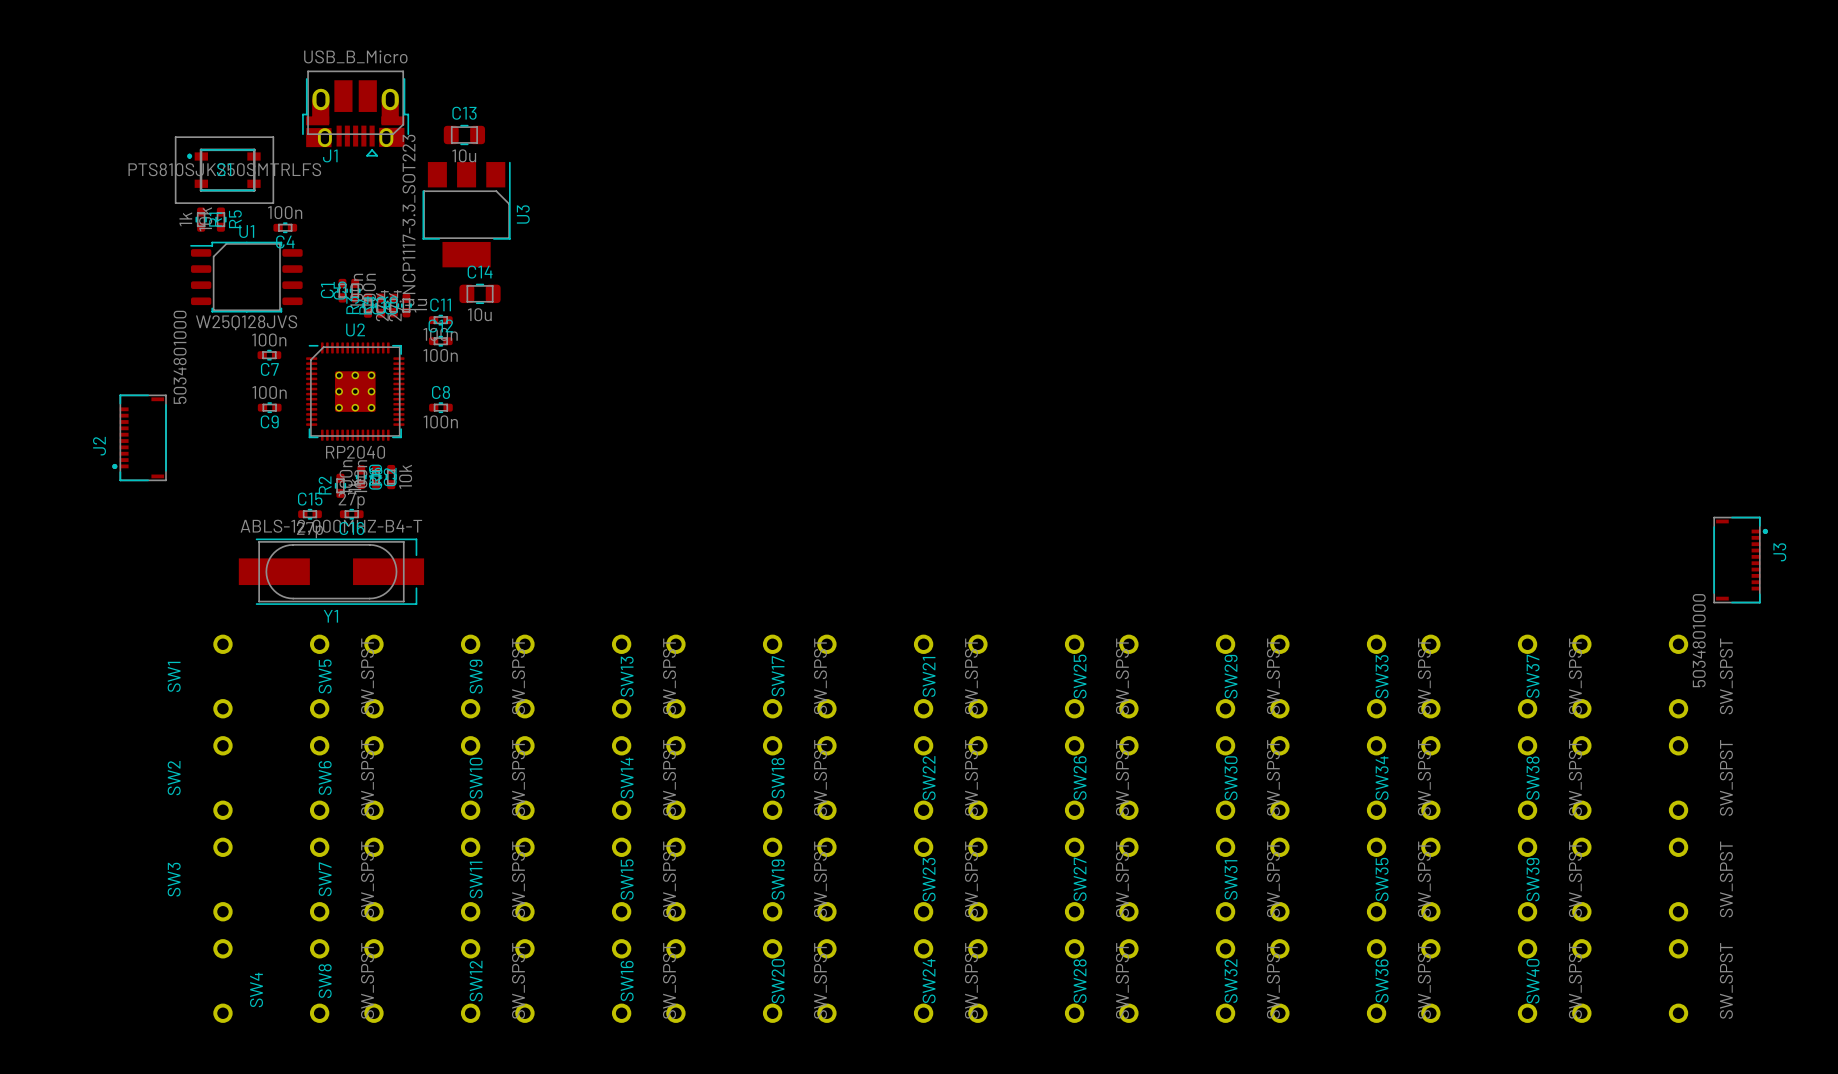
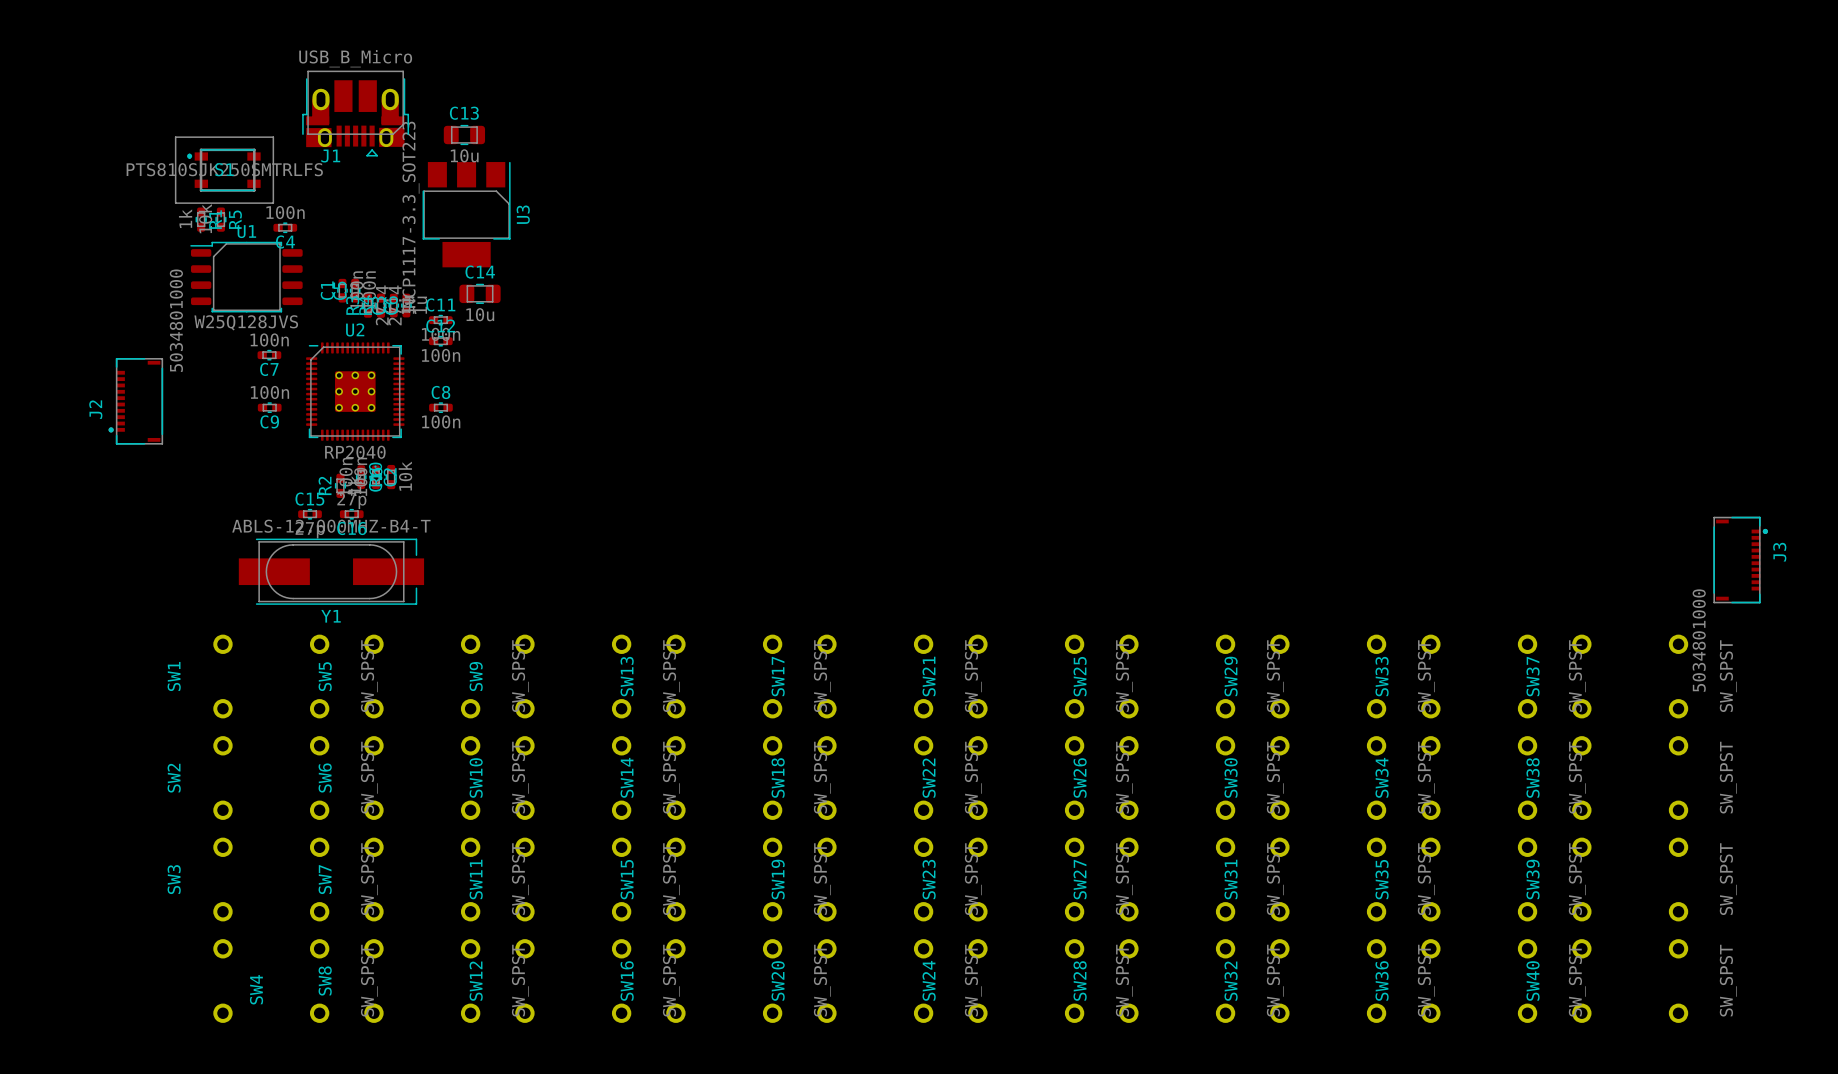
J2 position: (139, 437) -> (135, 401)

